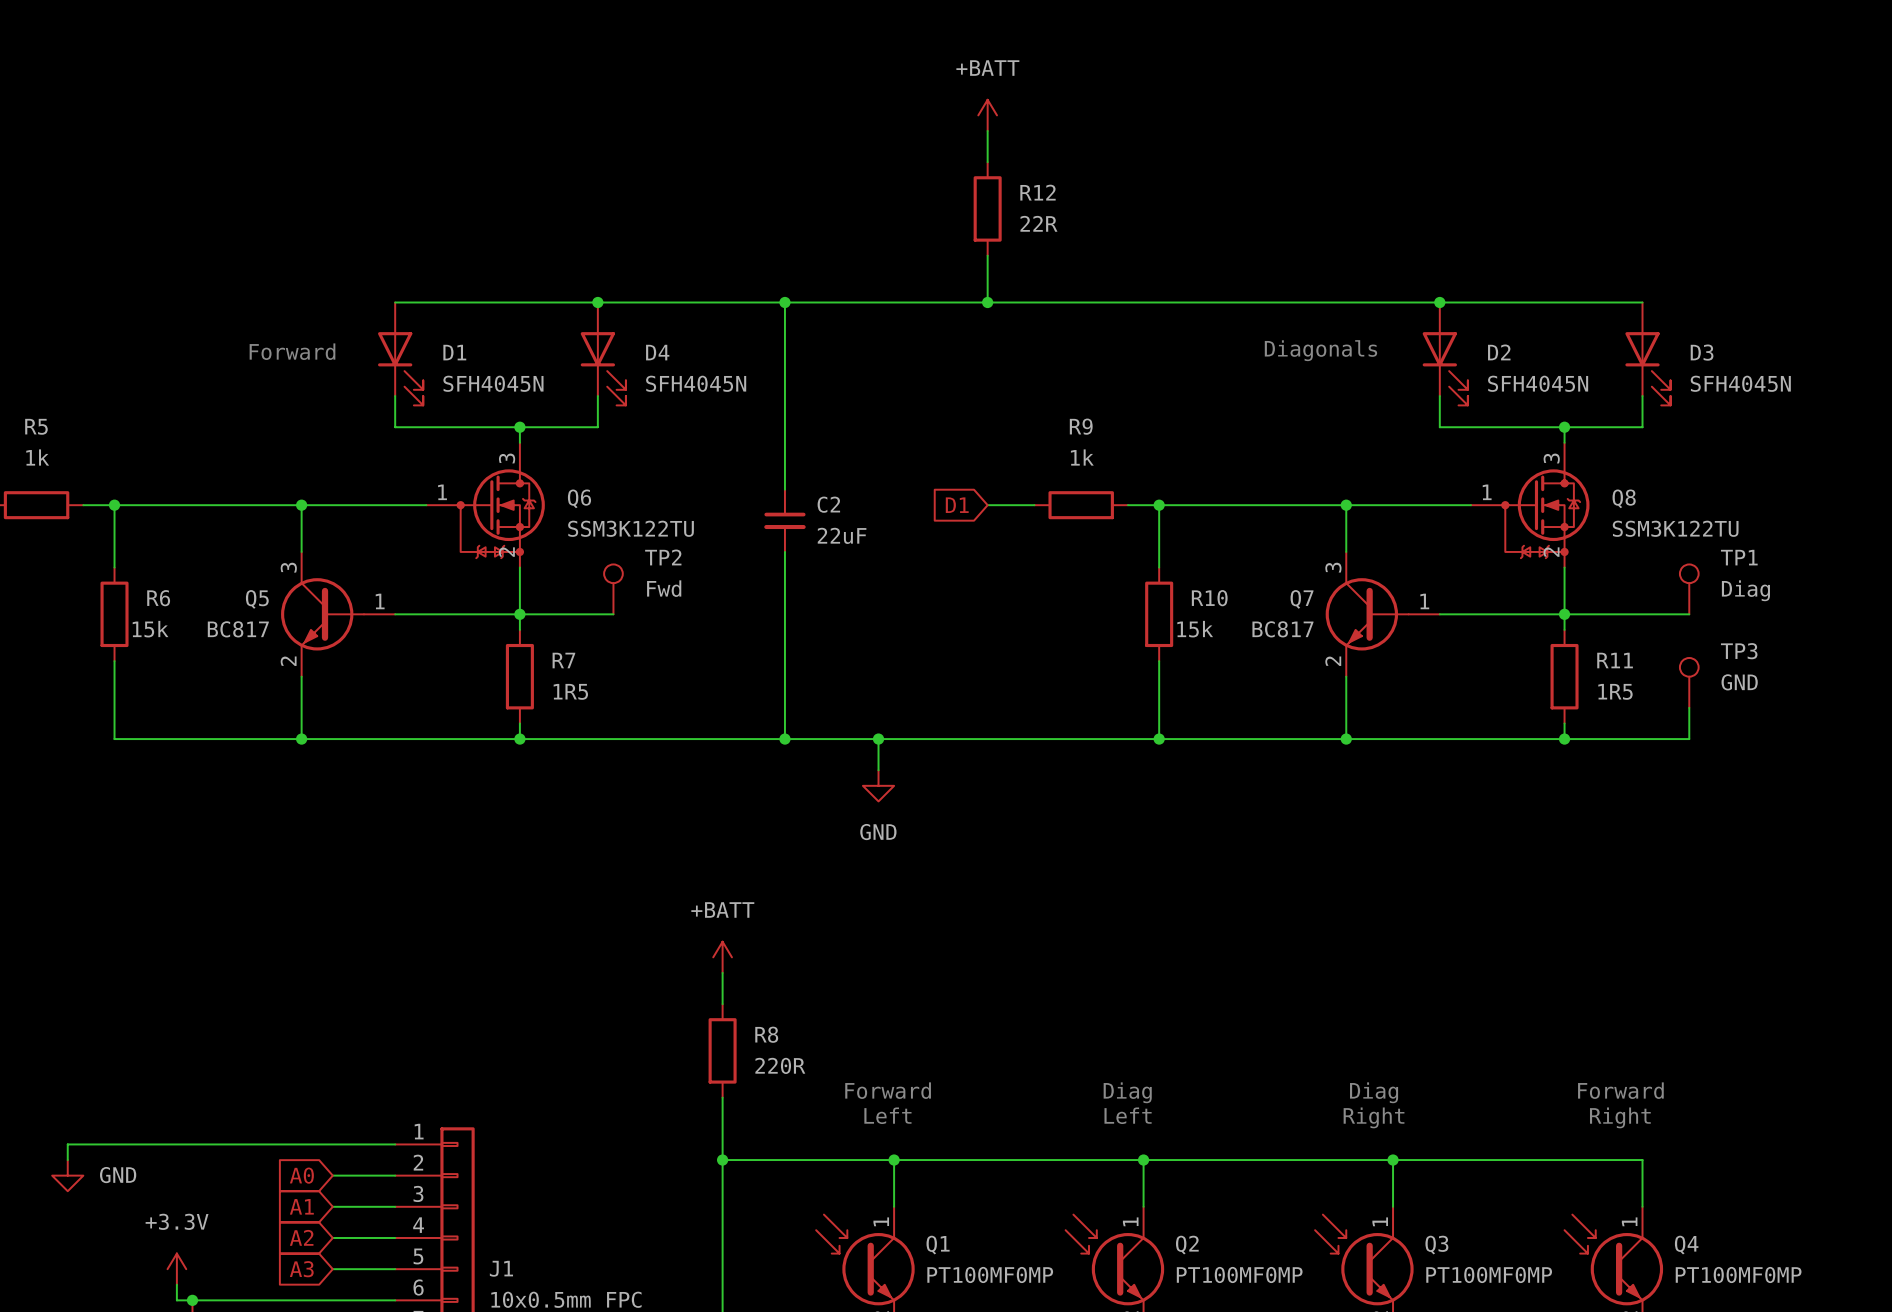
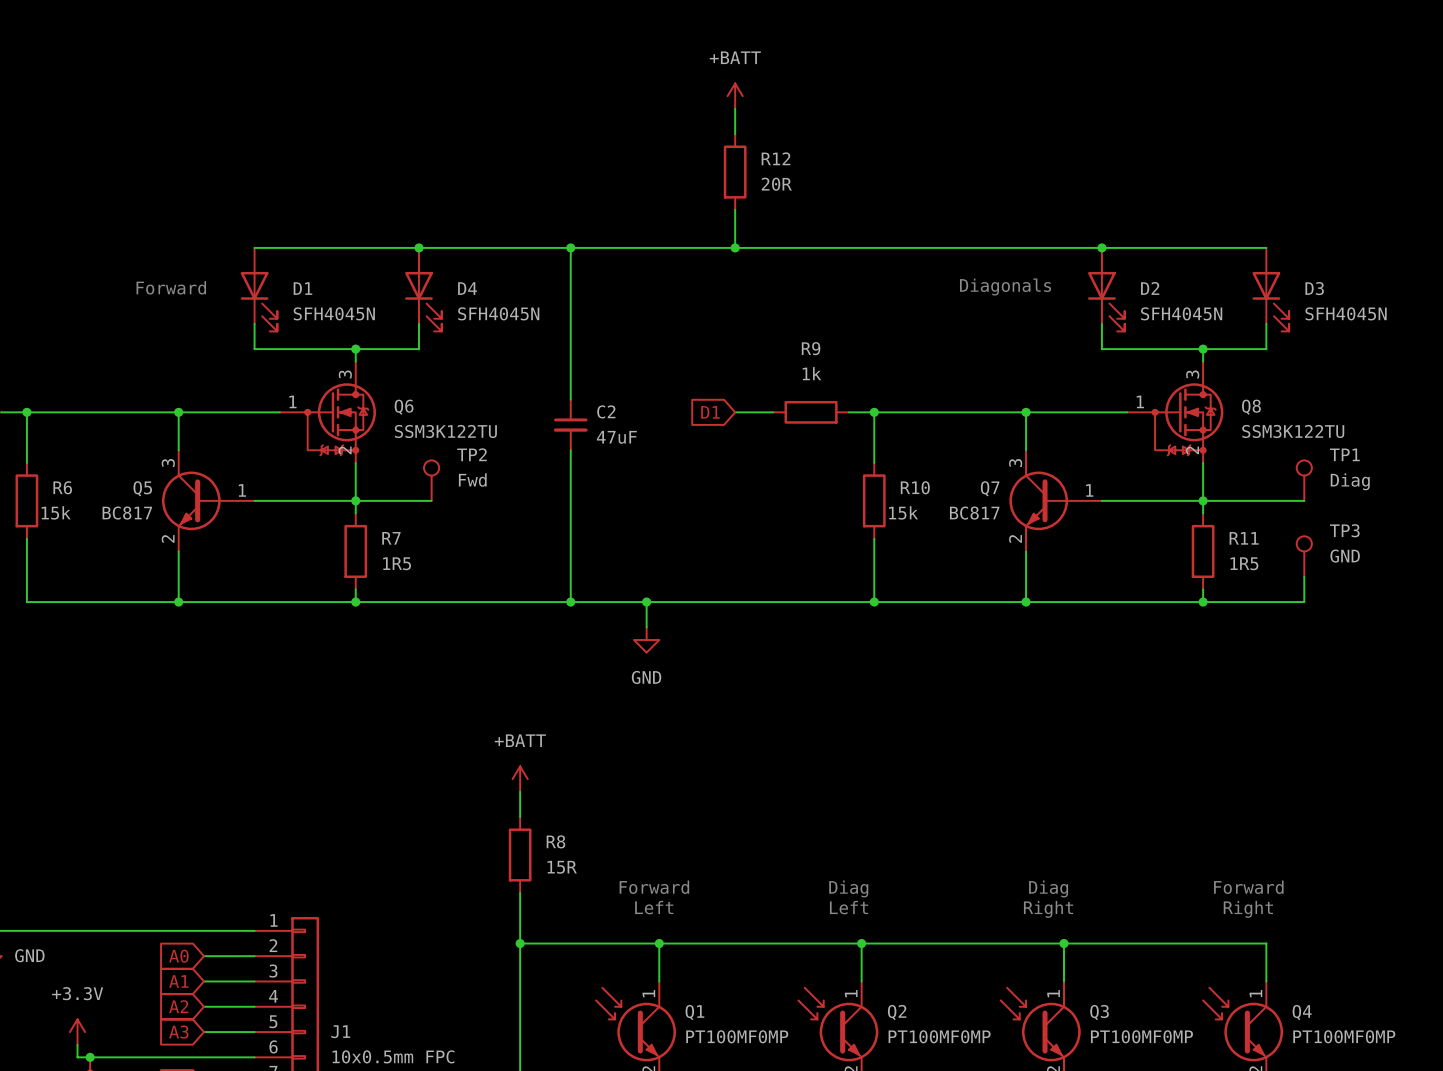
R12 value: 22R (1038, 223) -> 20R (776, 184)
C2 value: 22uF (842, 535) -> 47uF (616, 437)
R8 value: 220R (780, 1065) -> 15R (562, 867)

